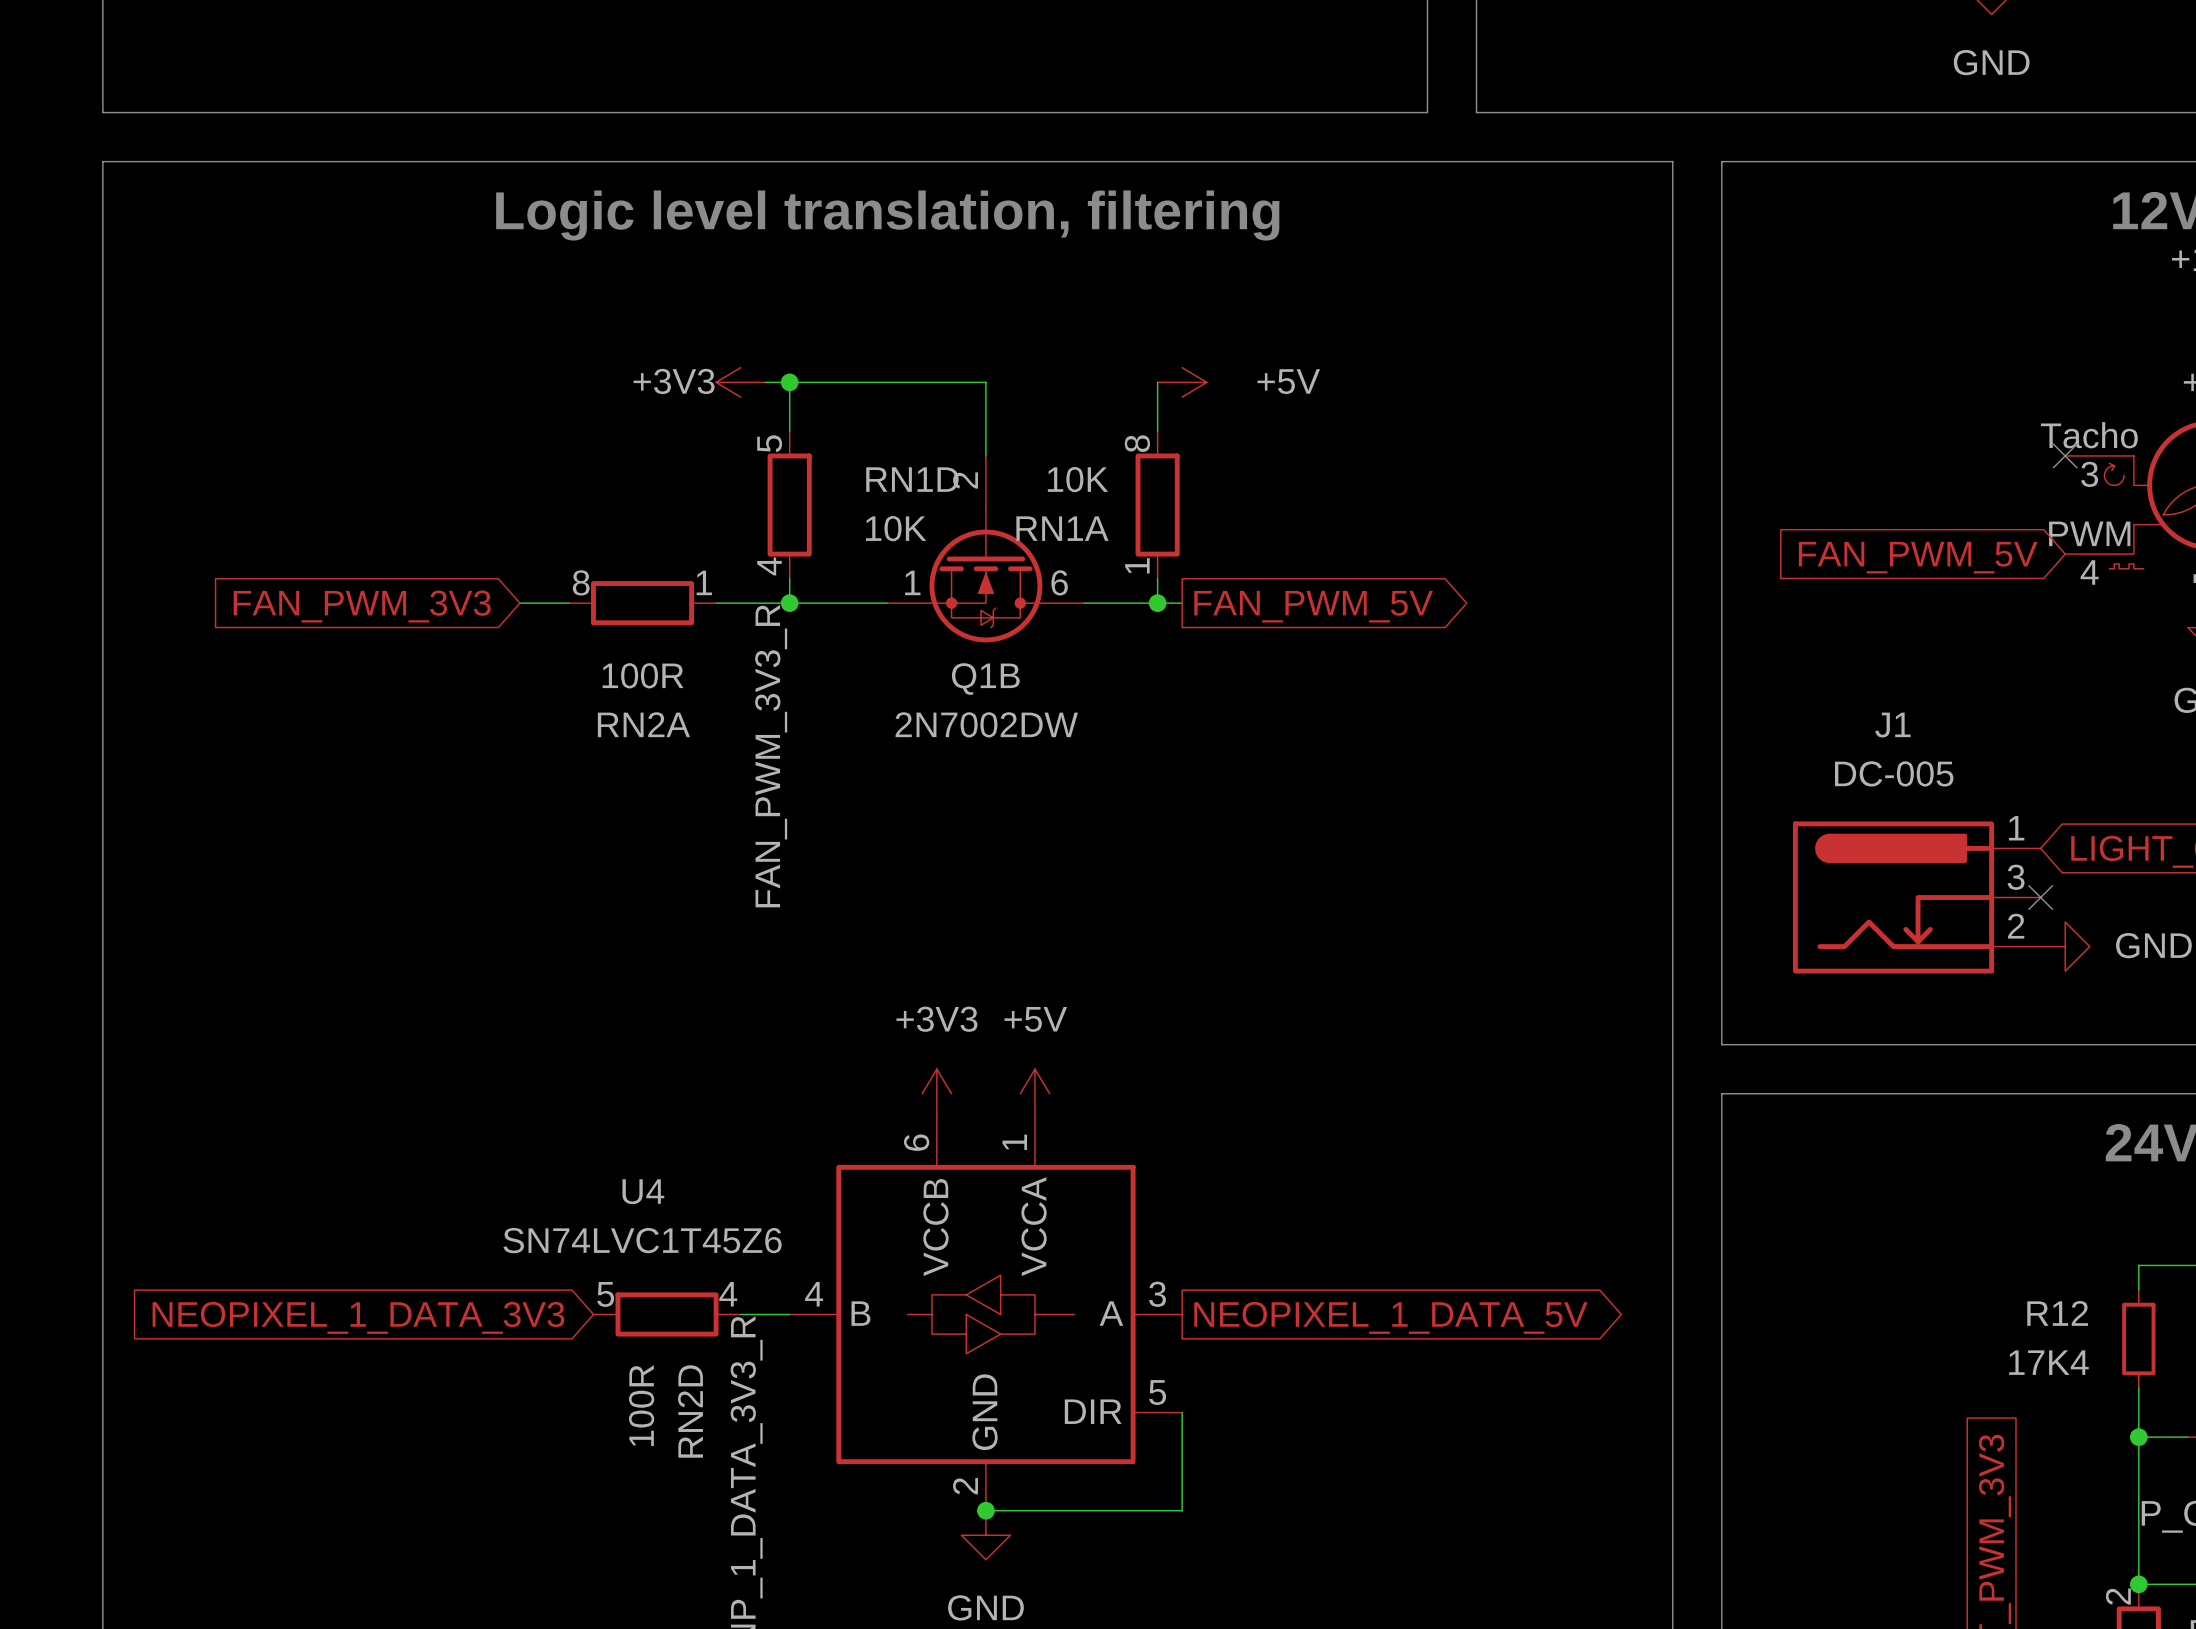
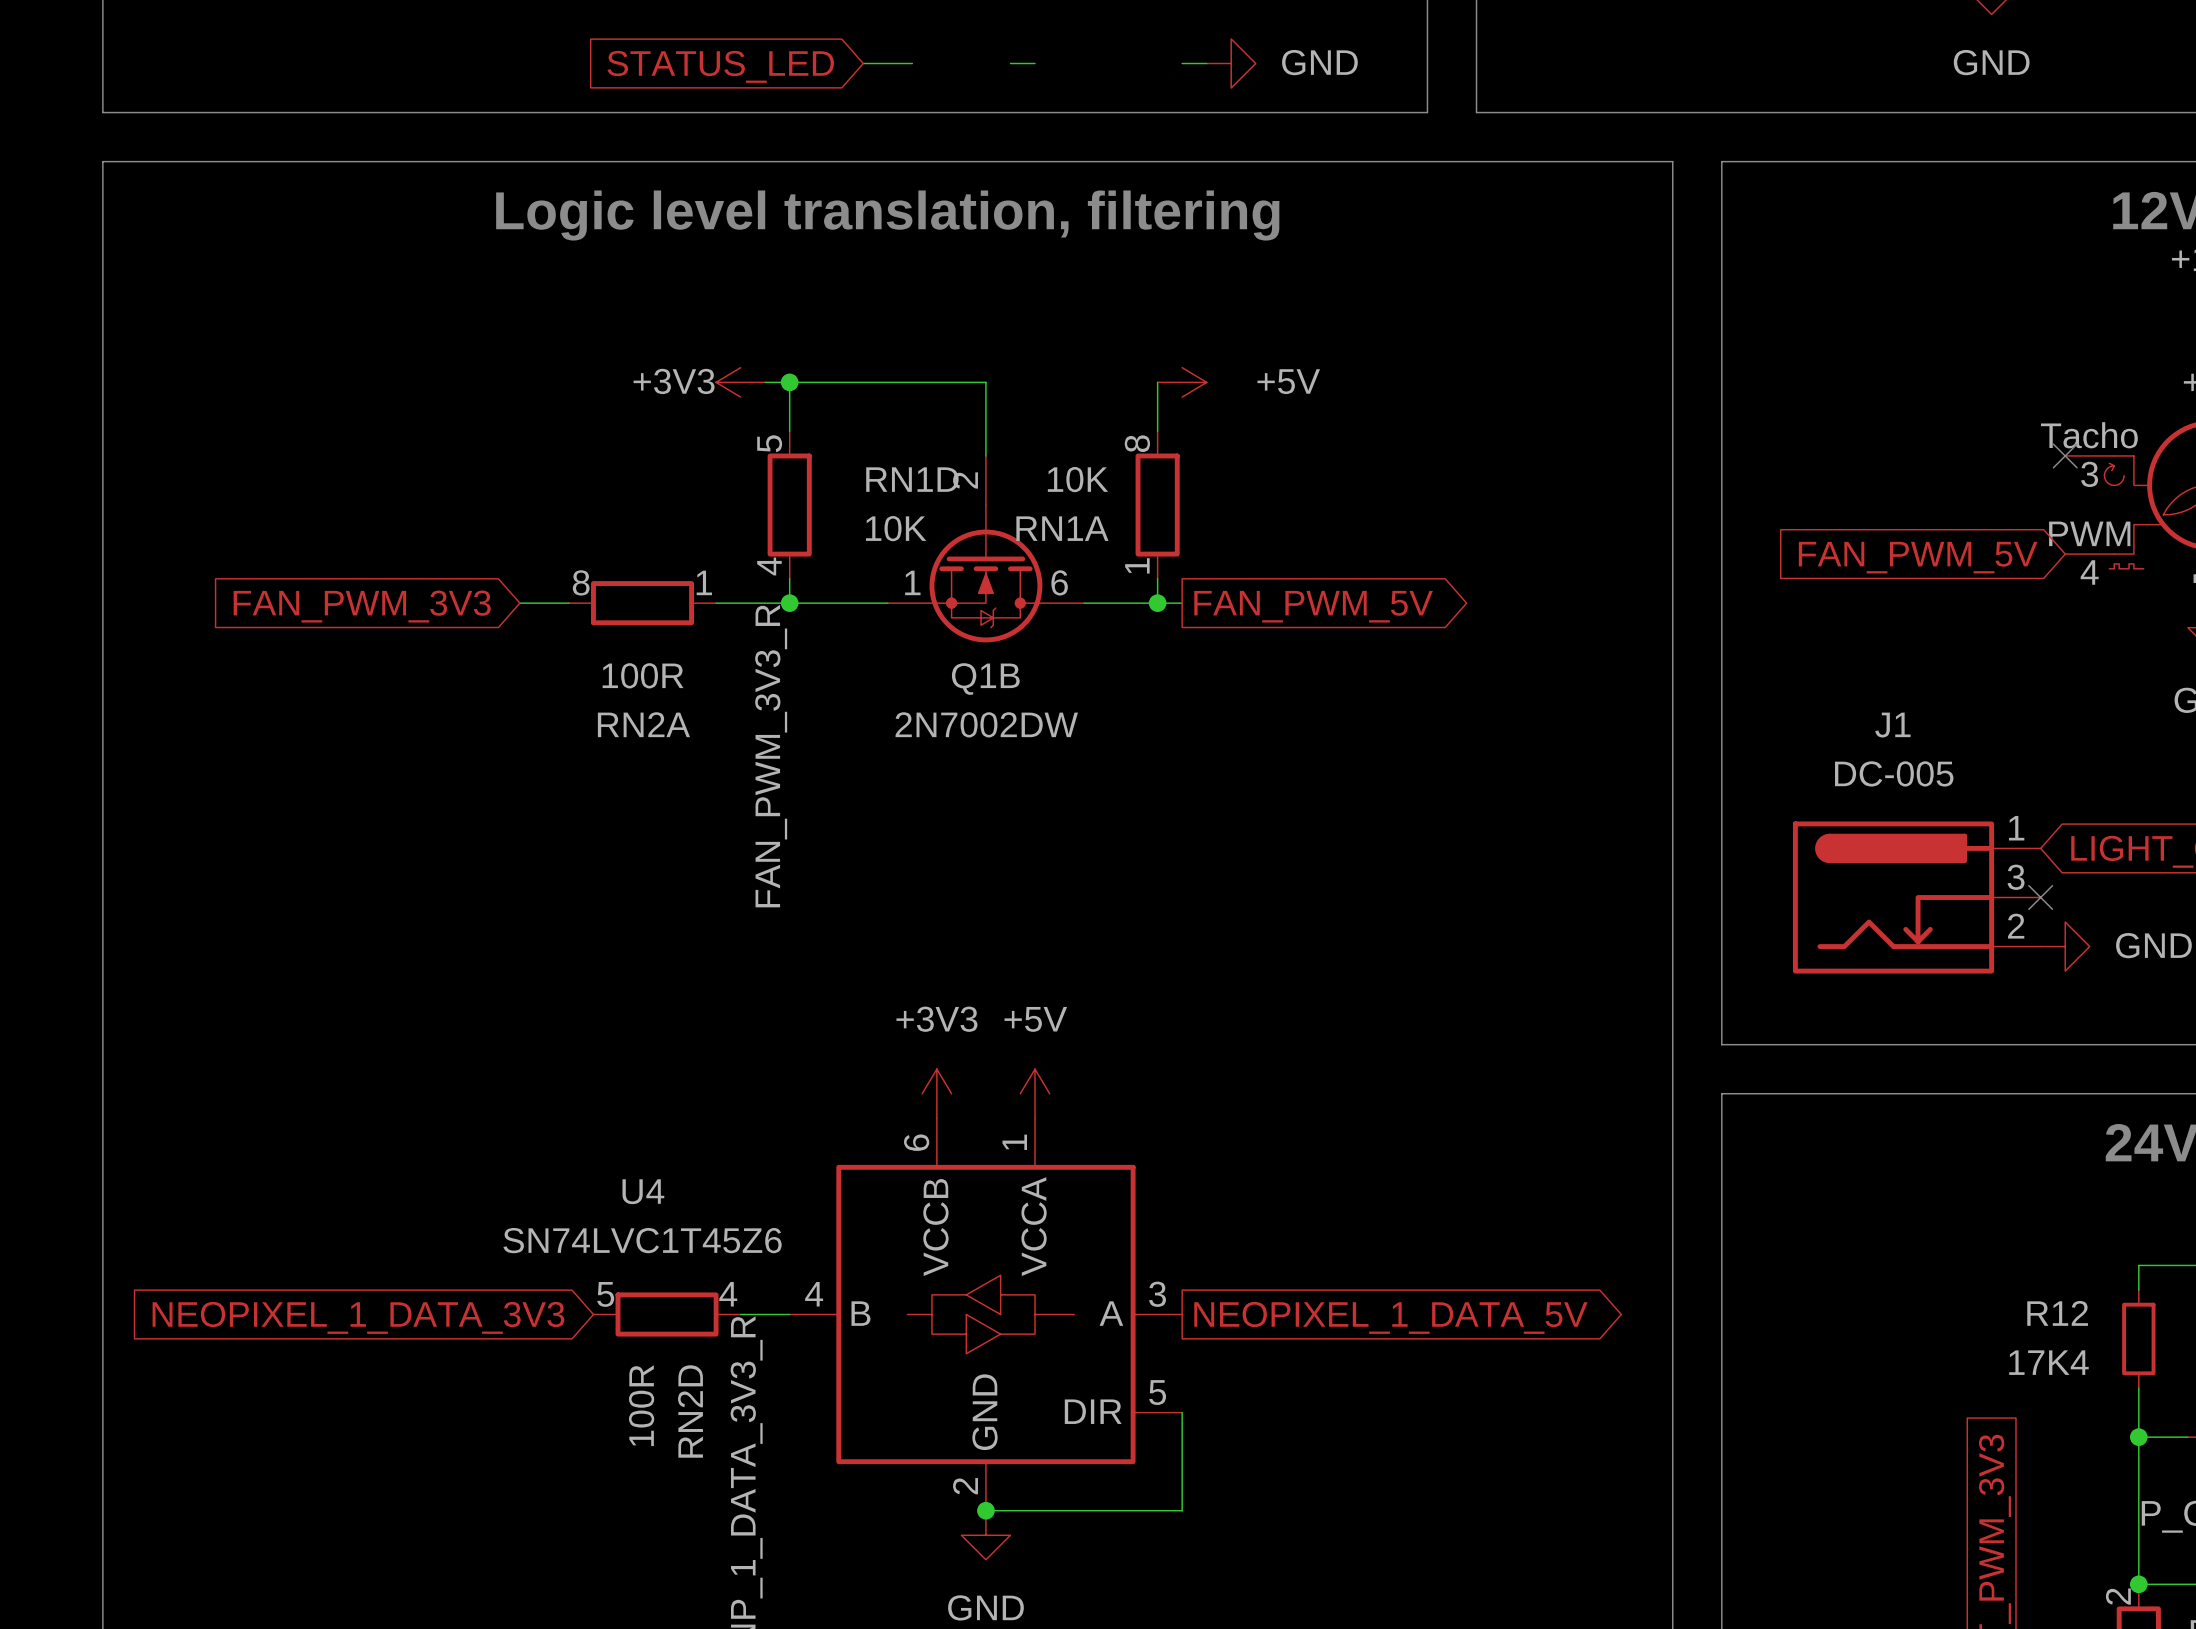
wire: none -> (863, 63) (912, 63)
wire: none -> (1010, 63) (1034, 63)
wire: none -> (1182, 63) (1206, 63)
power symbol: none -> GND (1231, 63)
global label: none -> STATUS_LED (720, 66)

